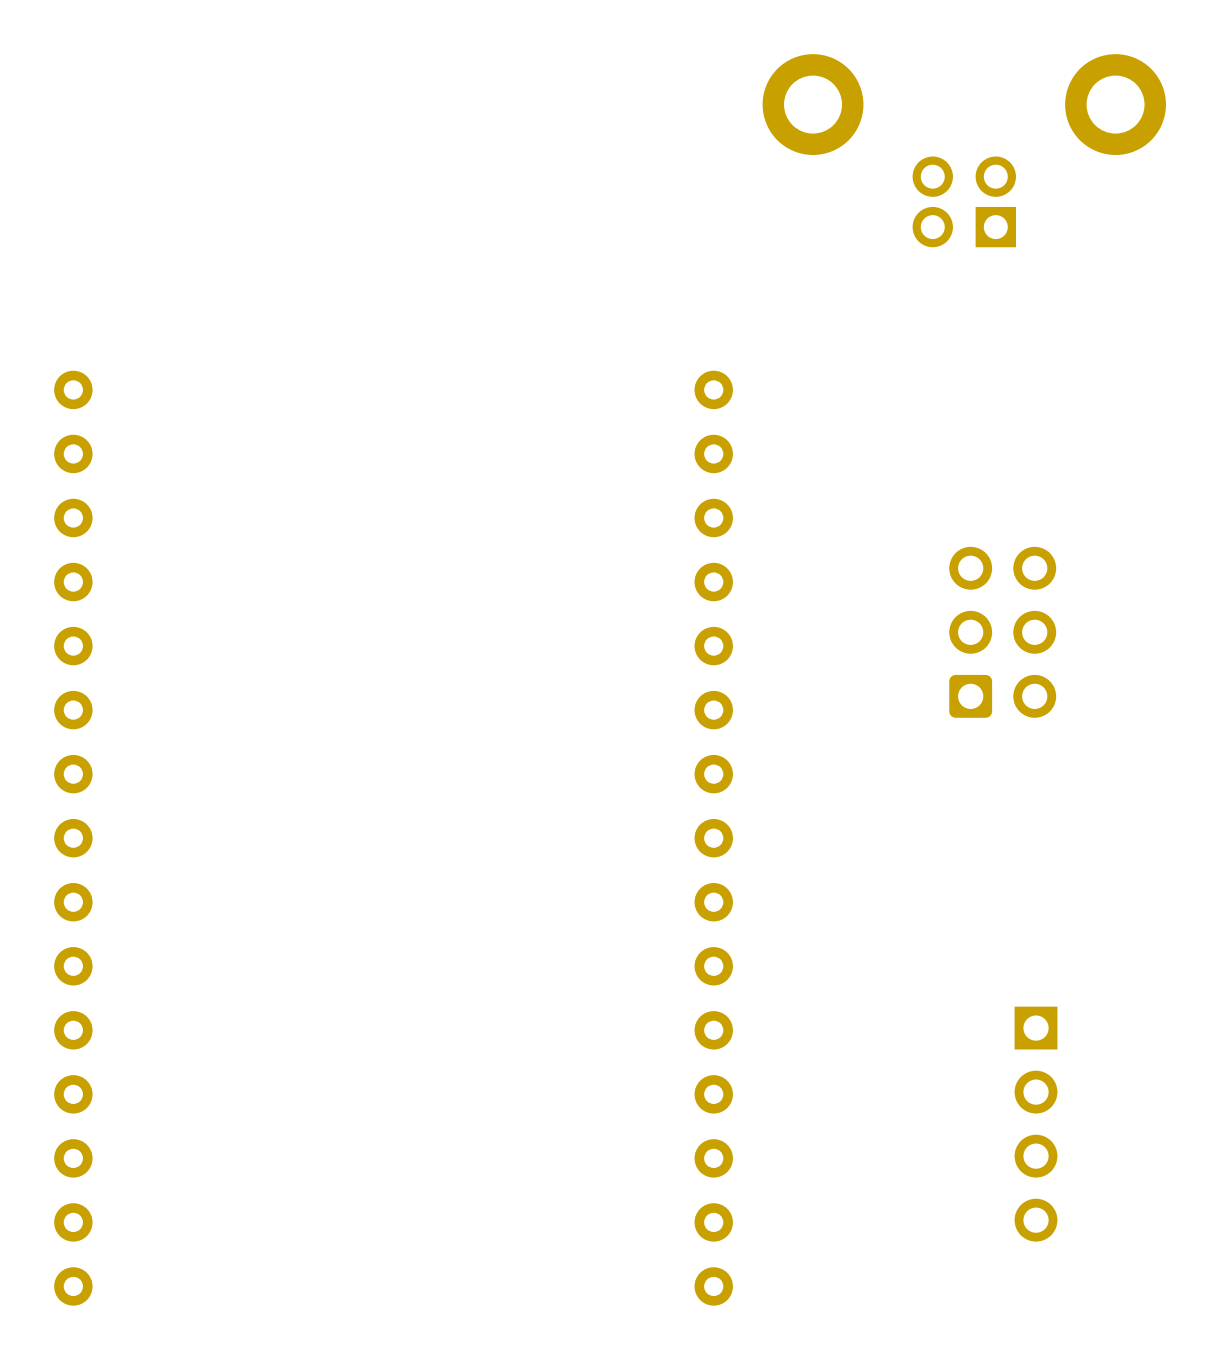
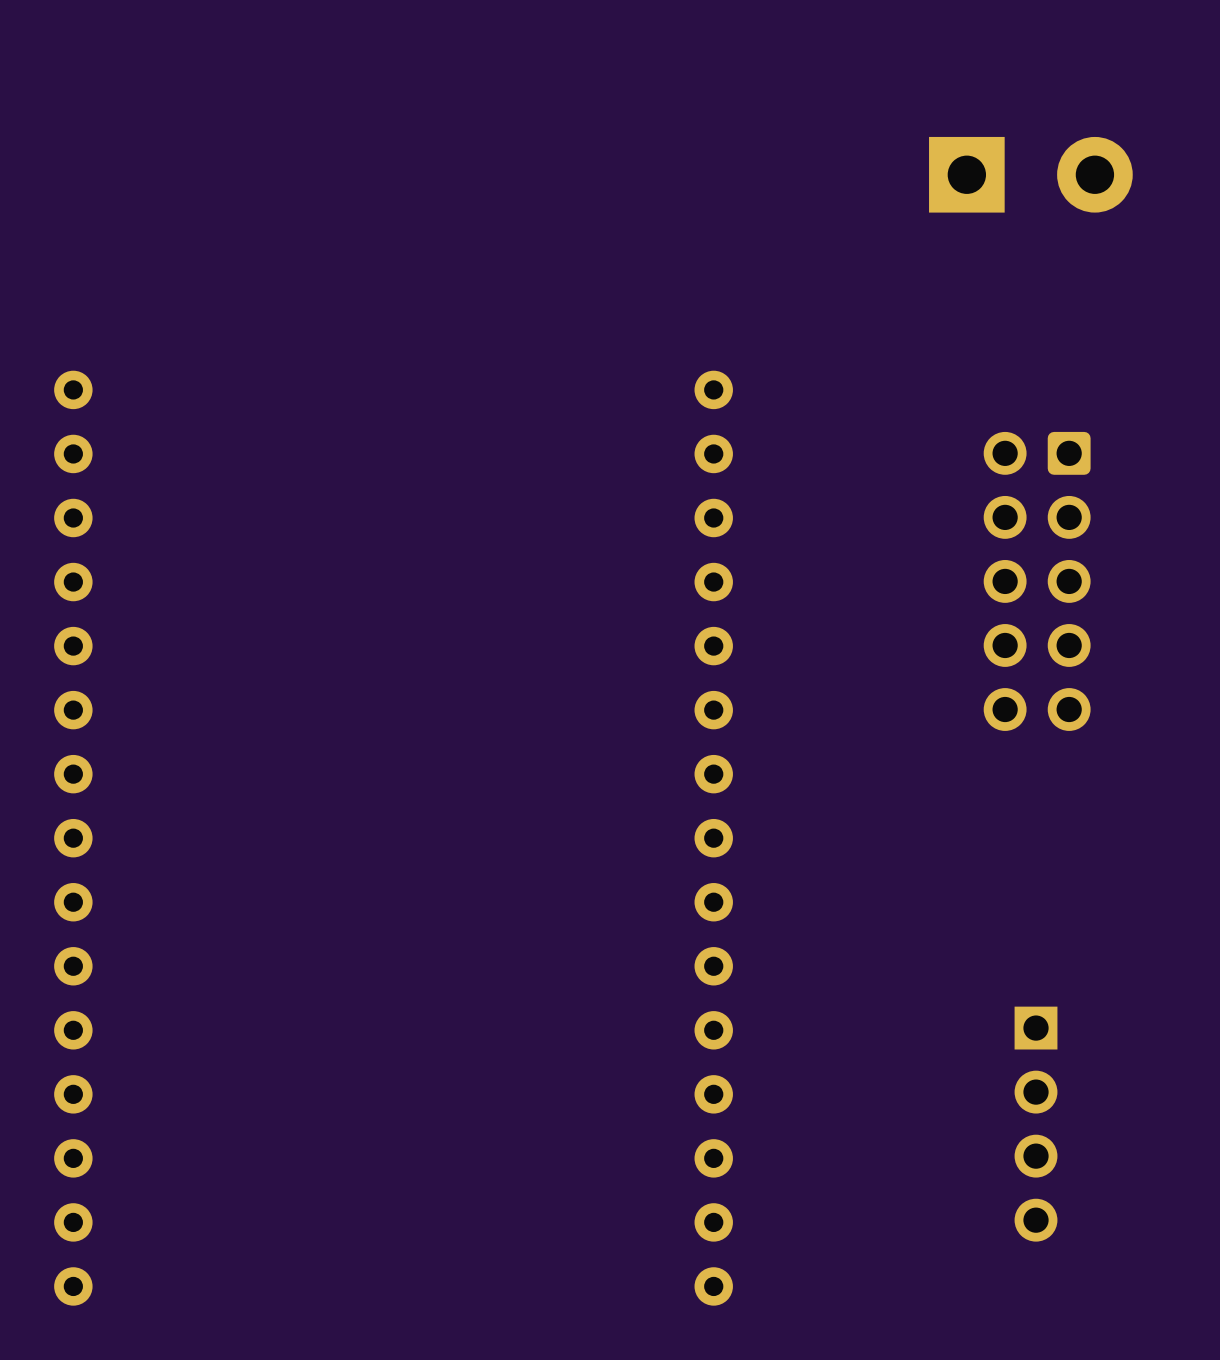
part: (964, 150) -> none
part: none -> (1030, 174)
part: none -> (1037, 581)
part: (1002, 632) -> none

